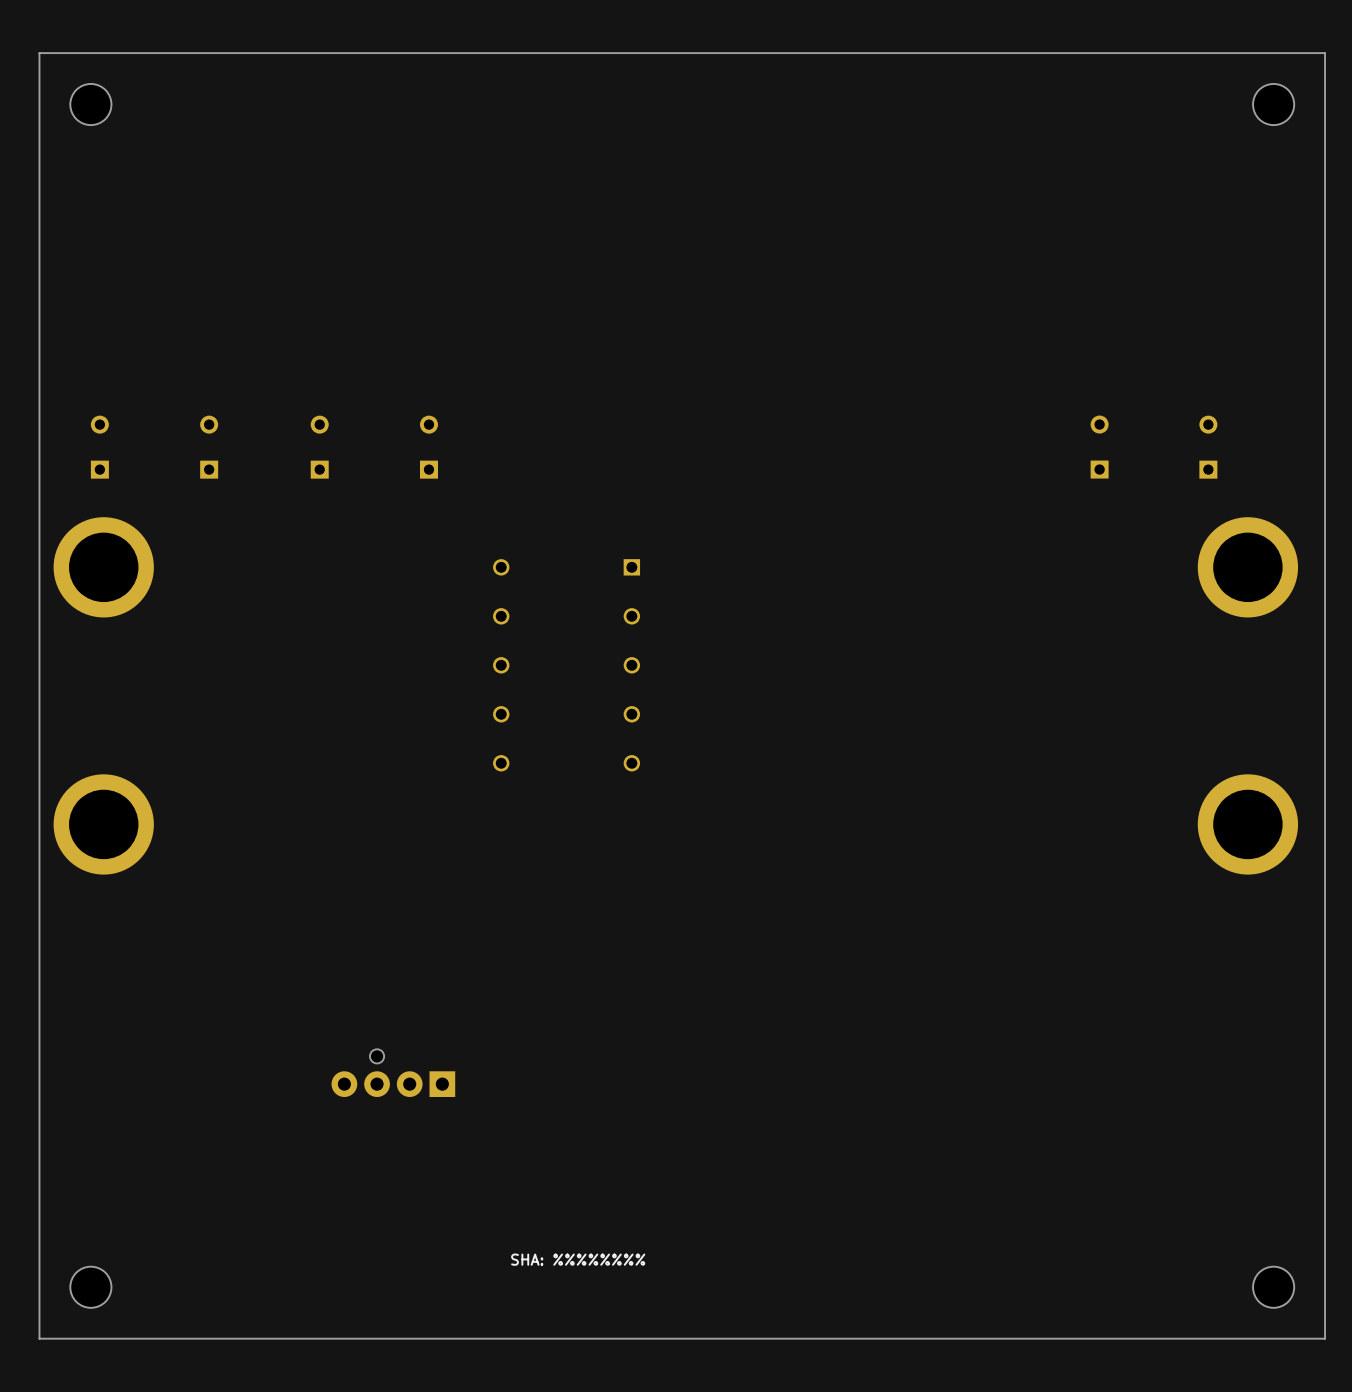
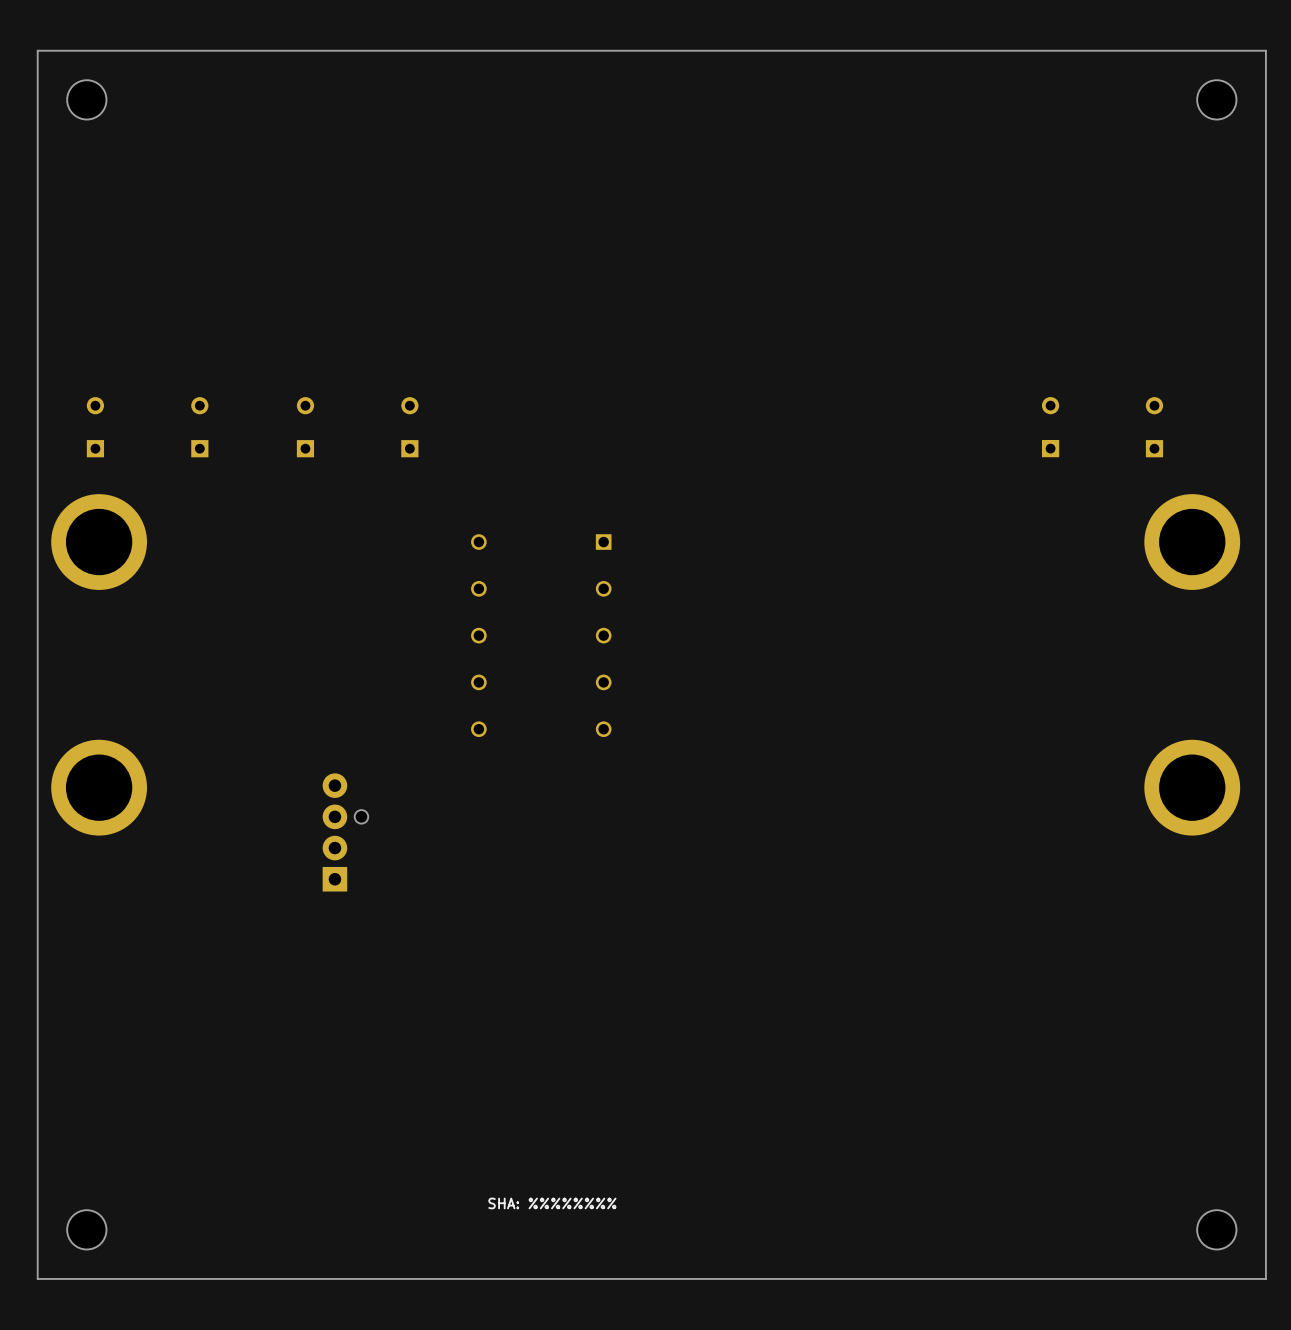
part rotation: 0° (393, 1073) -> 90° clockwise (345, 832)
part position: (393, 1073) -> (345, 832)

